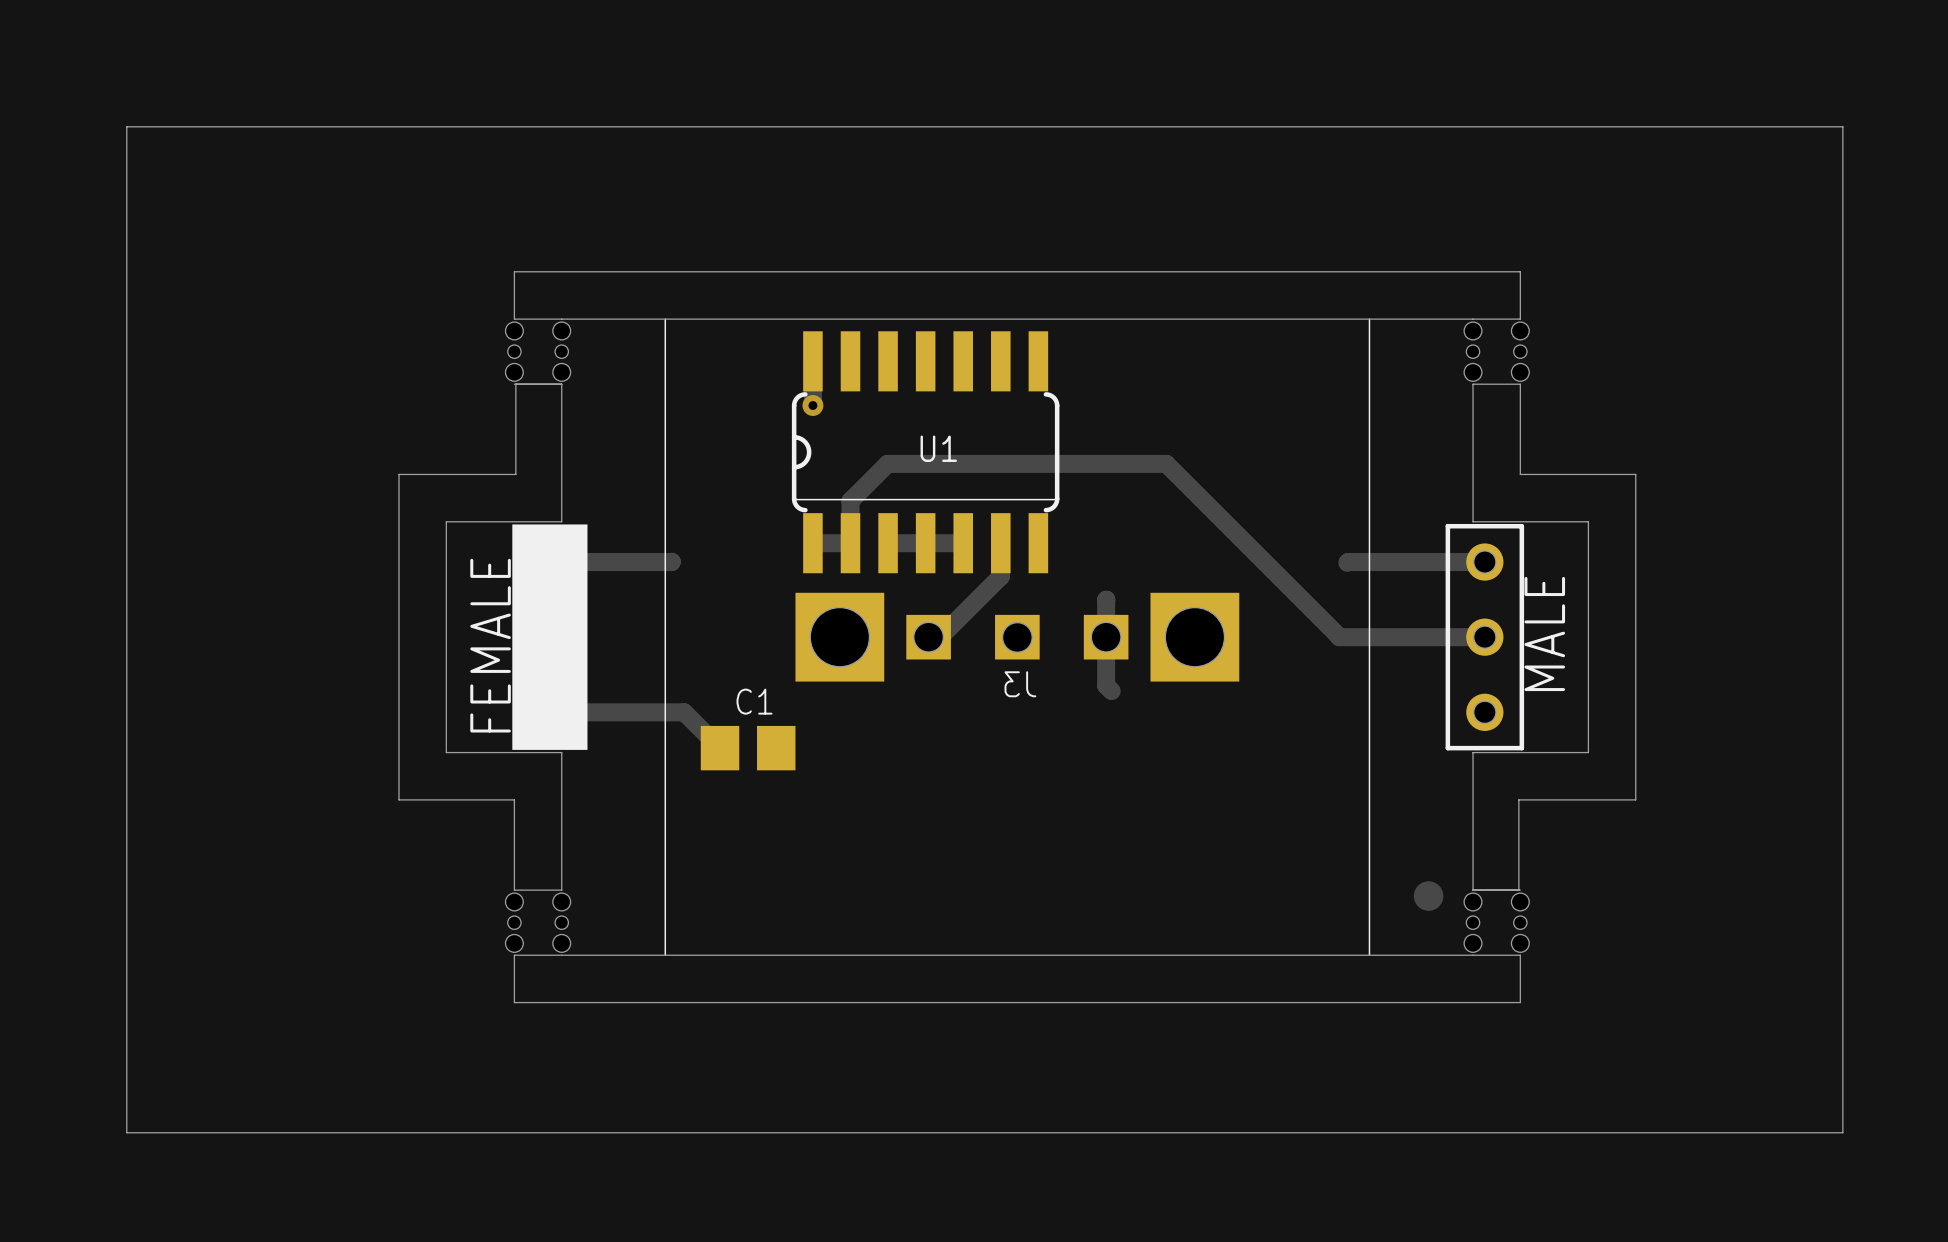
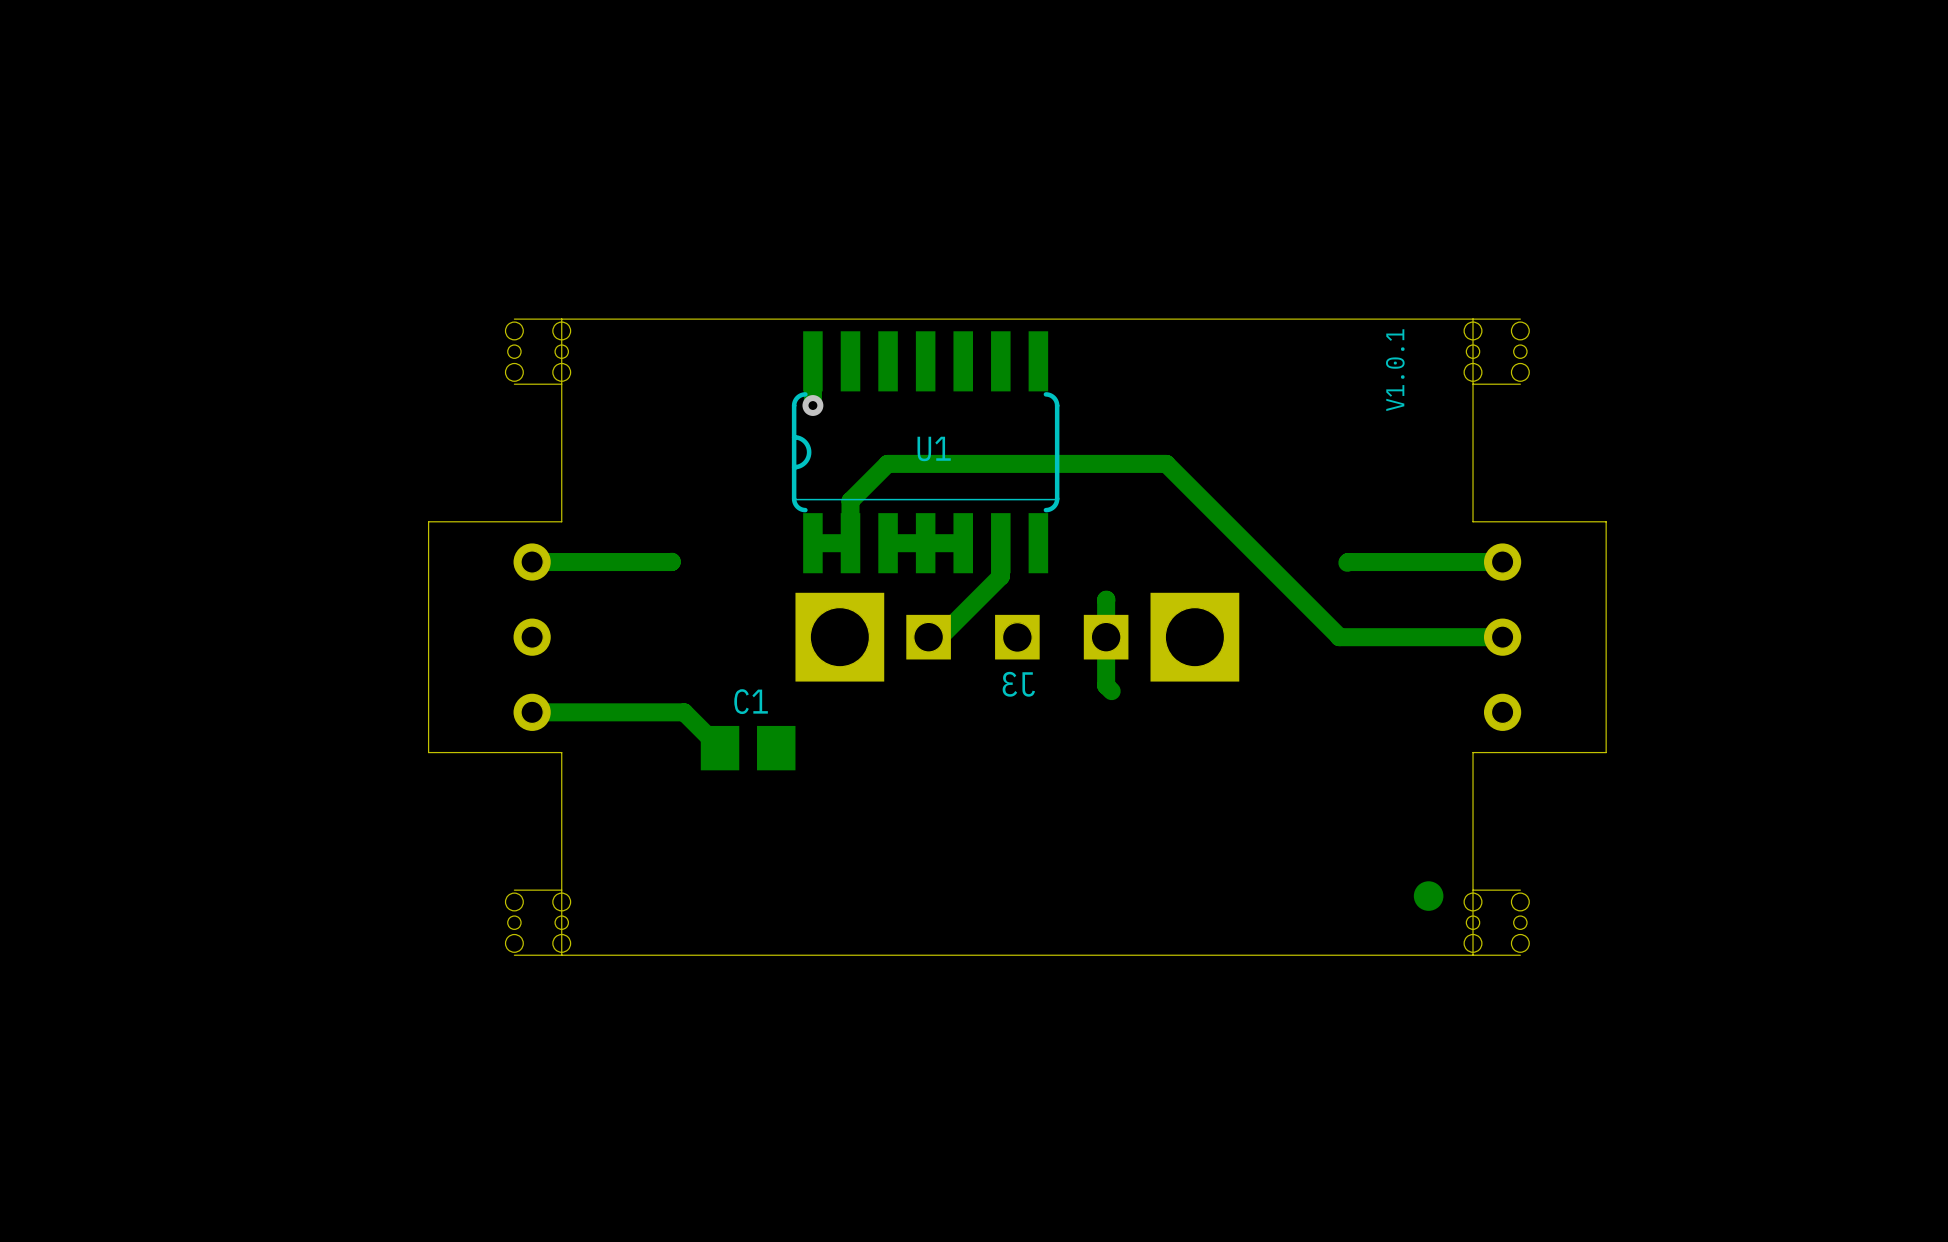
board edge: (1842, 126) (1842, 1132) (126, 1132) (126, 126) (1842, 126) -> none
line: (665, 319) (665, 955) -> none
line: (1369, 319) (1369, 955) -> none
board edge: none -> (1473, 319) (1473, 384)
board edge: (1520, 319) (1520, 271) (514, 271) (514, 319) -> none
text: none -> V1.0.1 (1395, 370)
board edge: (561, 384) (515, 384) (515, 474) (399, 474) (399, 799) (514, 799) (514, 890) -> (561, 384) (561, 319)
board edge: (1520, 384) (1520, 474) (1635, 474) (1635, 799) (1518, 799) (1518, 890) (1473, 890) -> (1473, 955) (1473, 890)
board edge: (446, 521) (446, 752) -> (446, 521) (428, 521) (428, 752) (446, 752)
board edge: (1588, 521) (1588, 752) -> (1588, 521) (1606, 521) (1606, 752) (1588, 752)
part footprint: [1445, 523, 1525, 751] -> [1483, 543, 1522, 731]
part footprint: [512, 524, 588, 750] -> [513, 543, 551, 731]
board edge: none -> (561, 890) (561, 955)
board edge: (1520, 955) (1520, 1002) (514, 1002) (514, 955) -> none

